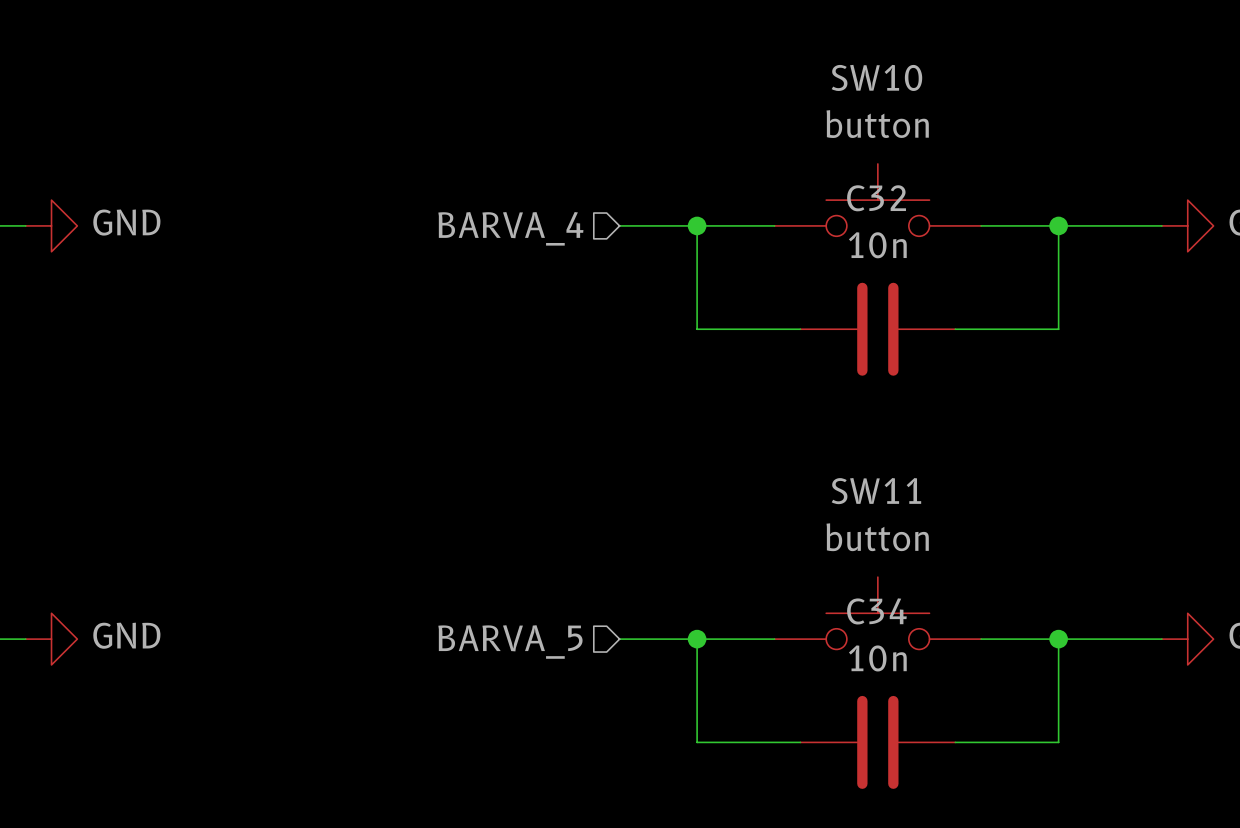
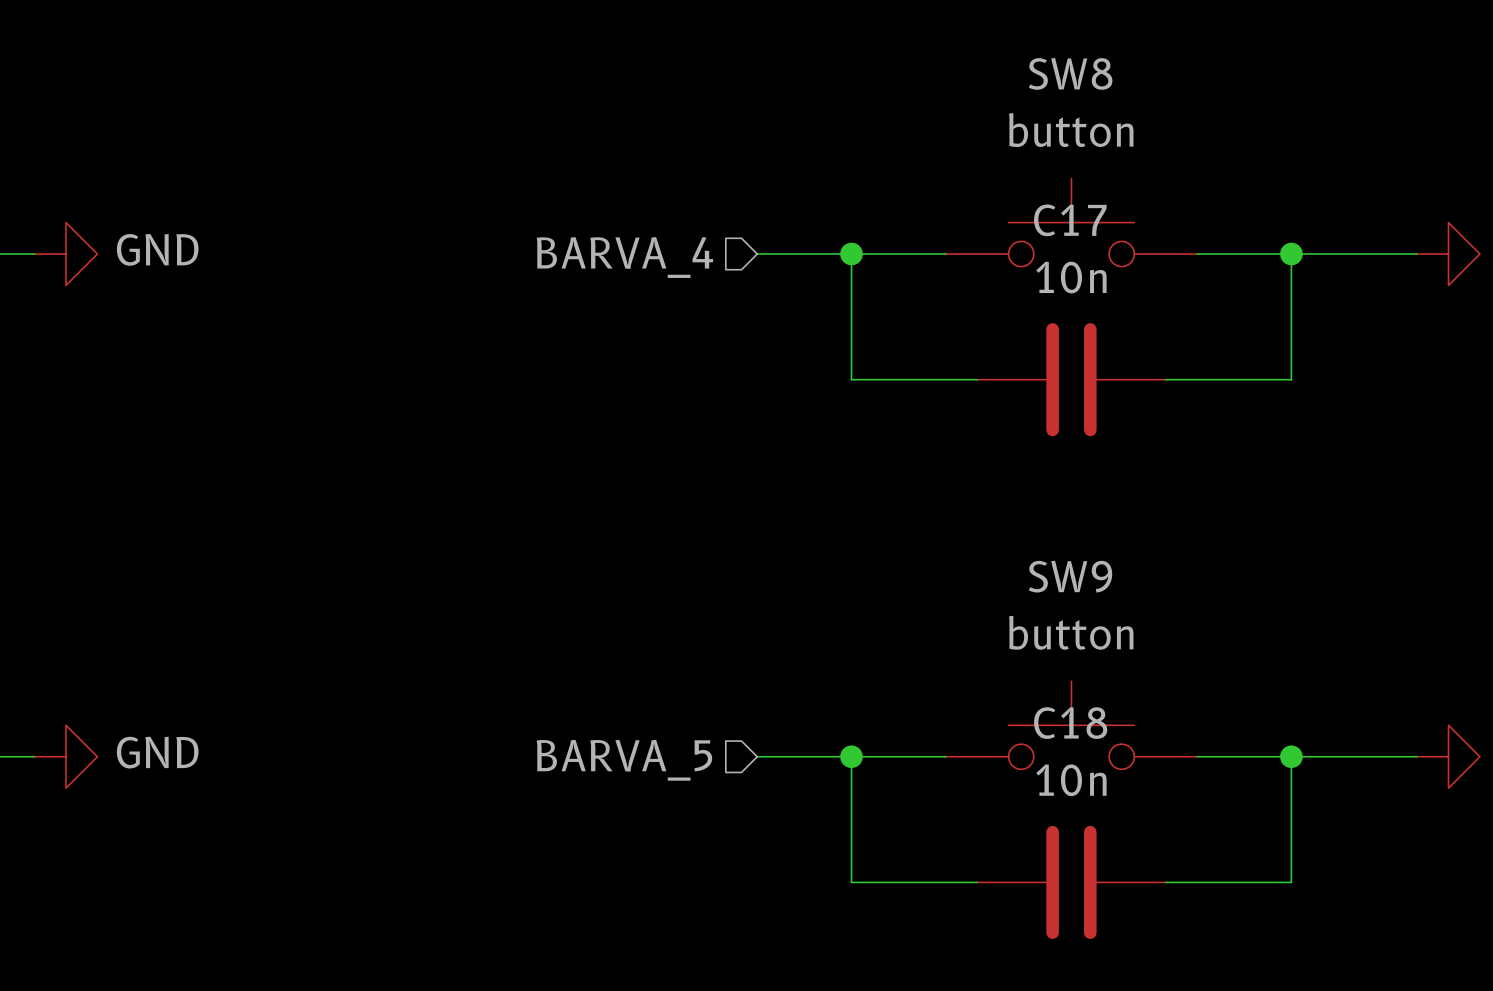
SW10 name: SW10 (876, 77) -> SW8 (1070, 73)
C32 name: C32 (876, 198) -> C17 (1070, 220)
SW11 name: SW11 (876, 491) -> SW9 (1070, 576)
C34 name: C34 (876, 611) -> C18 (1070, 723)

